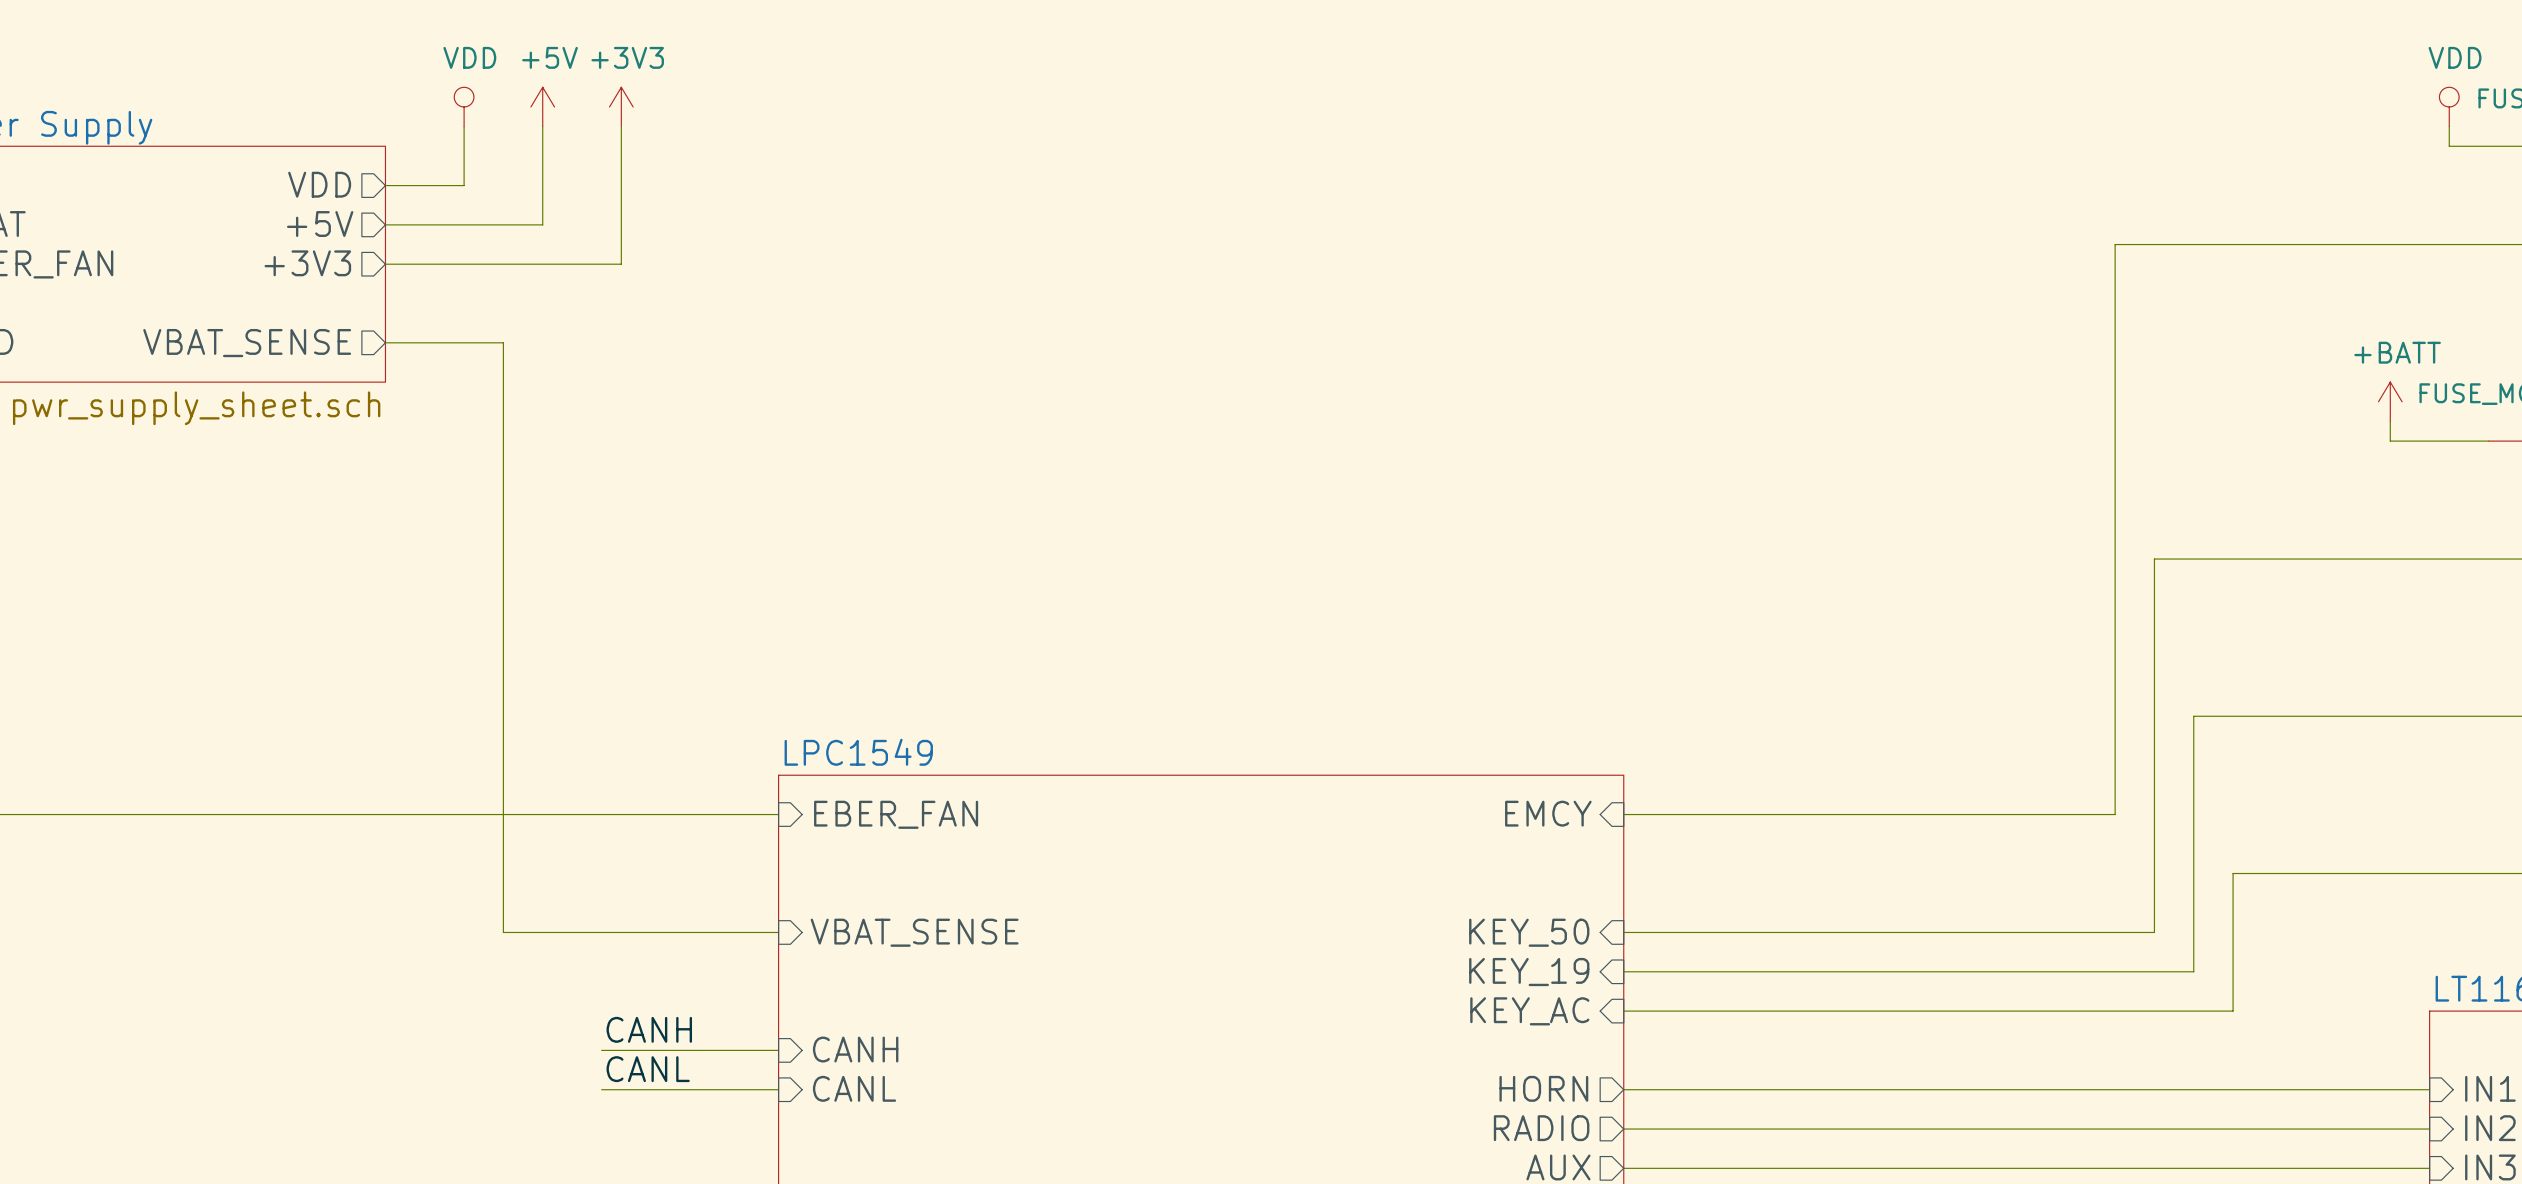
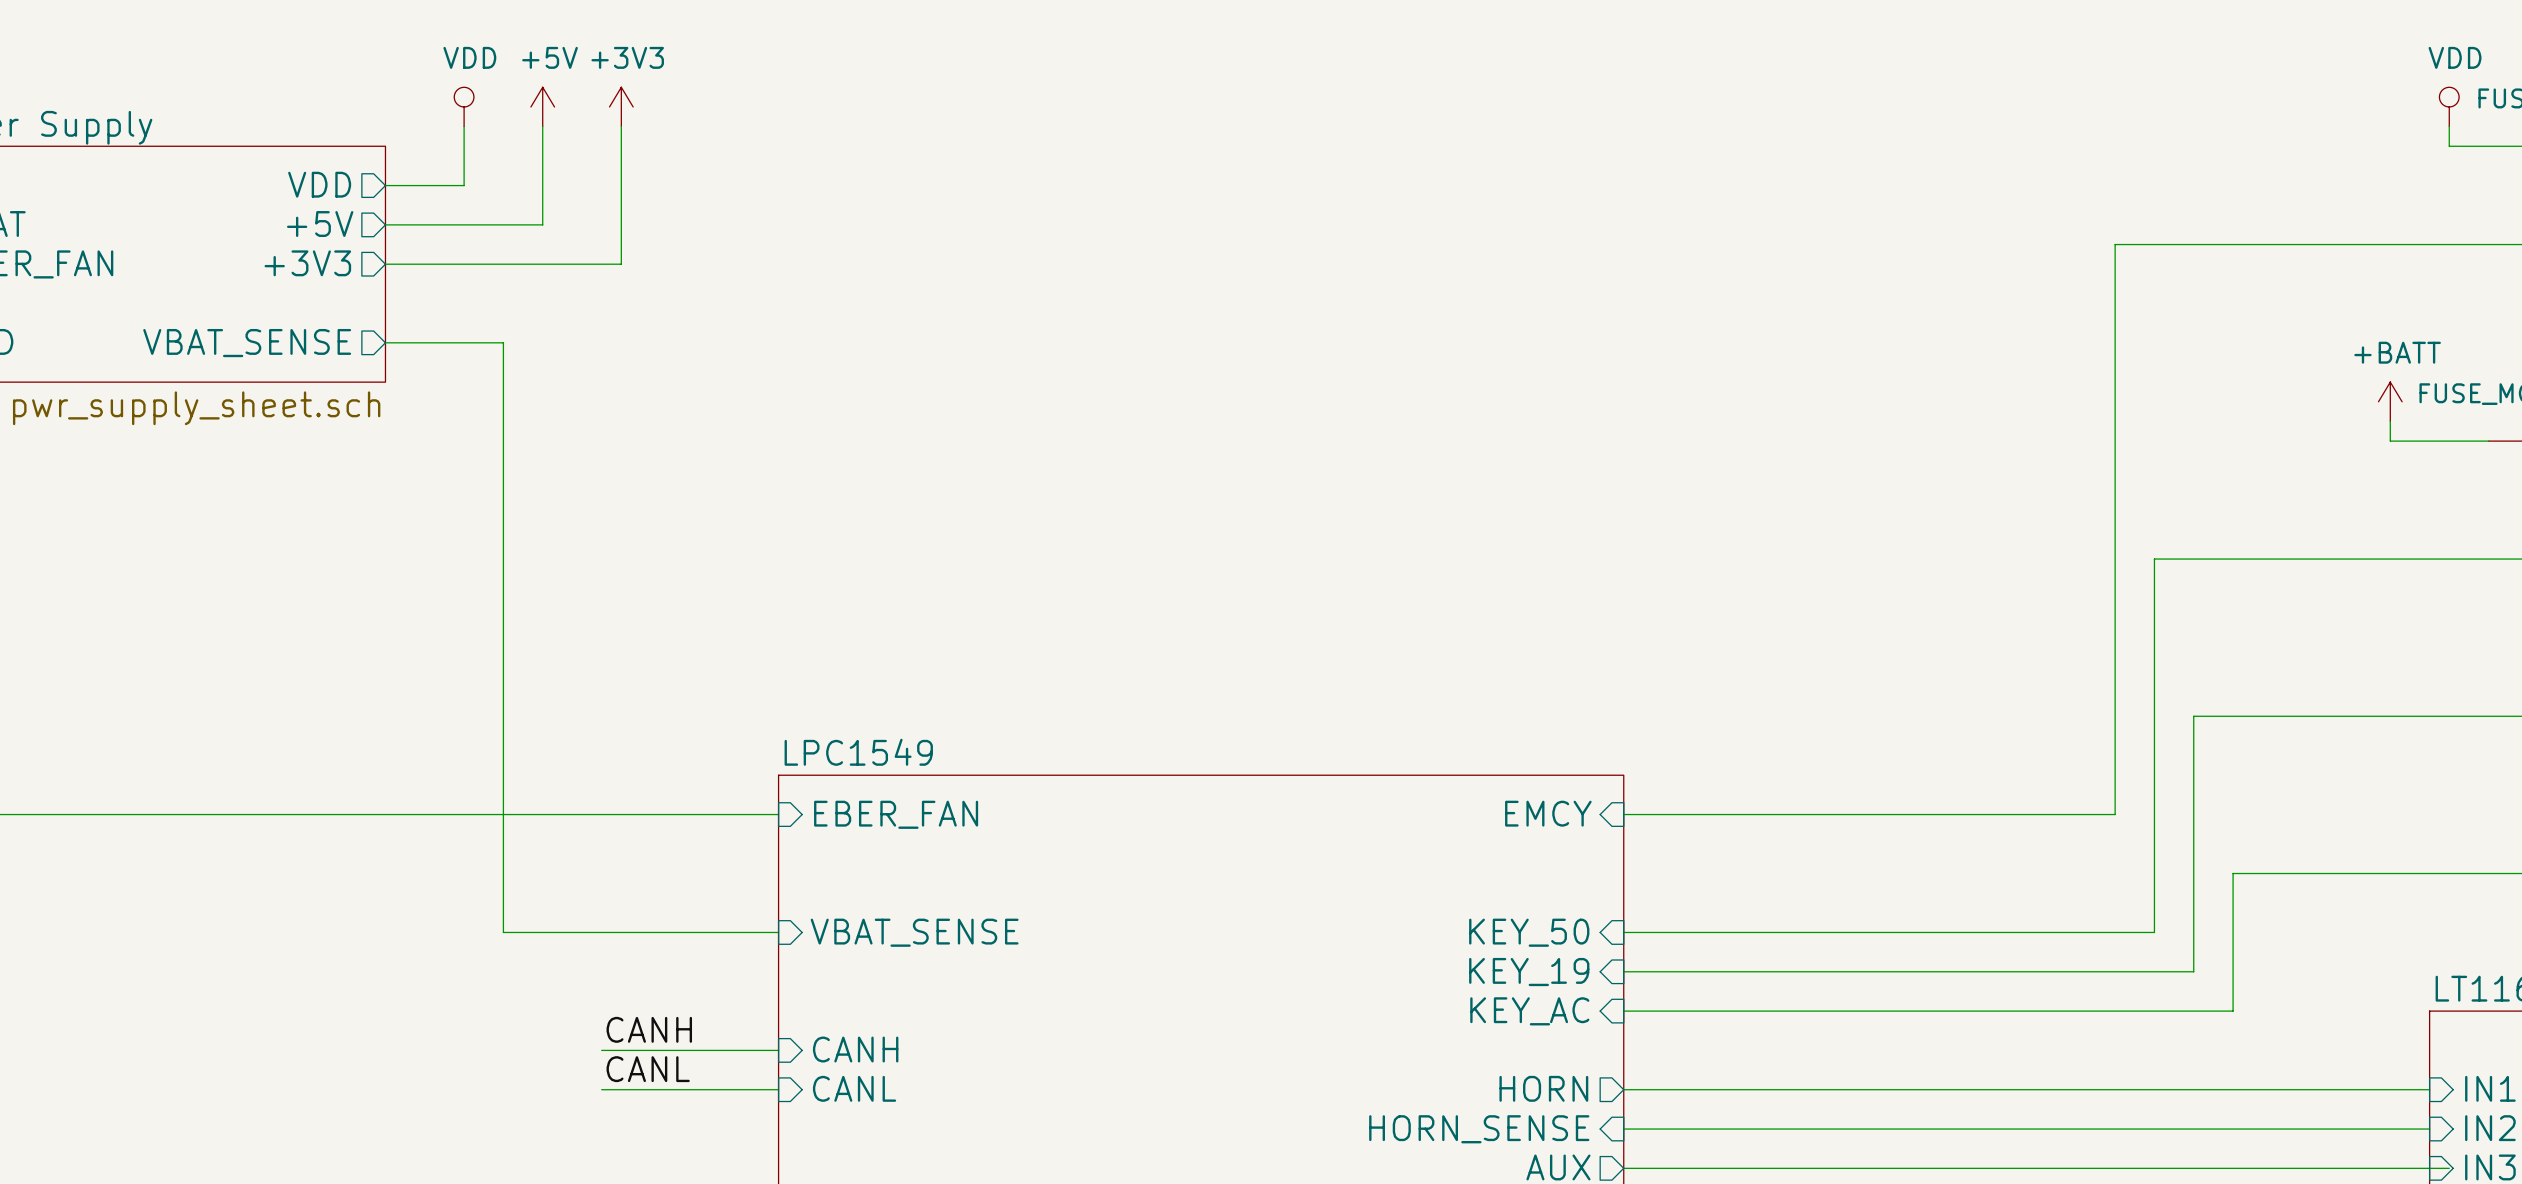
sheet pin shape: output (1541, 1128) -> input (1479, 1129)
sheet pin: RADIO (1541, 1128) -> HORN_SENSE (1479, 1129)
wire: none -> (2429, 1168) (2449, 1168)

